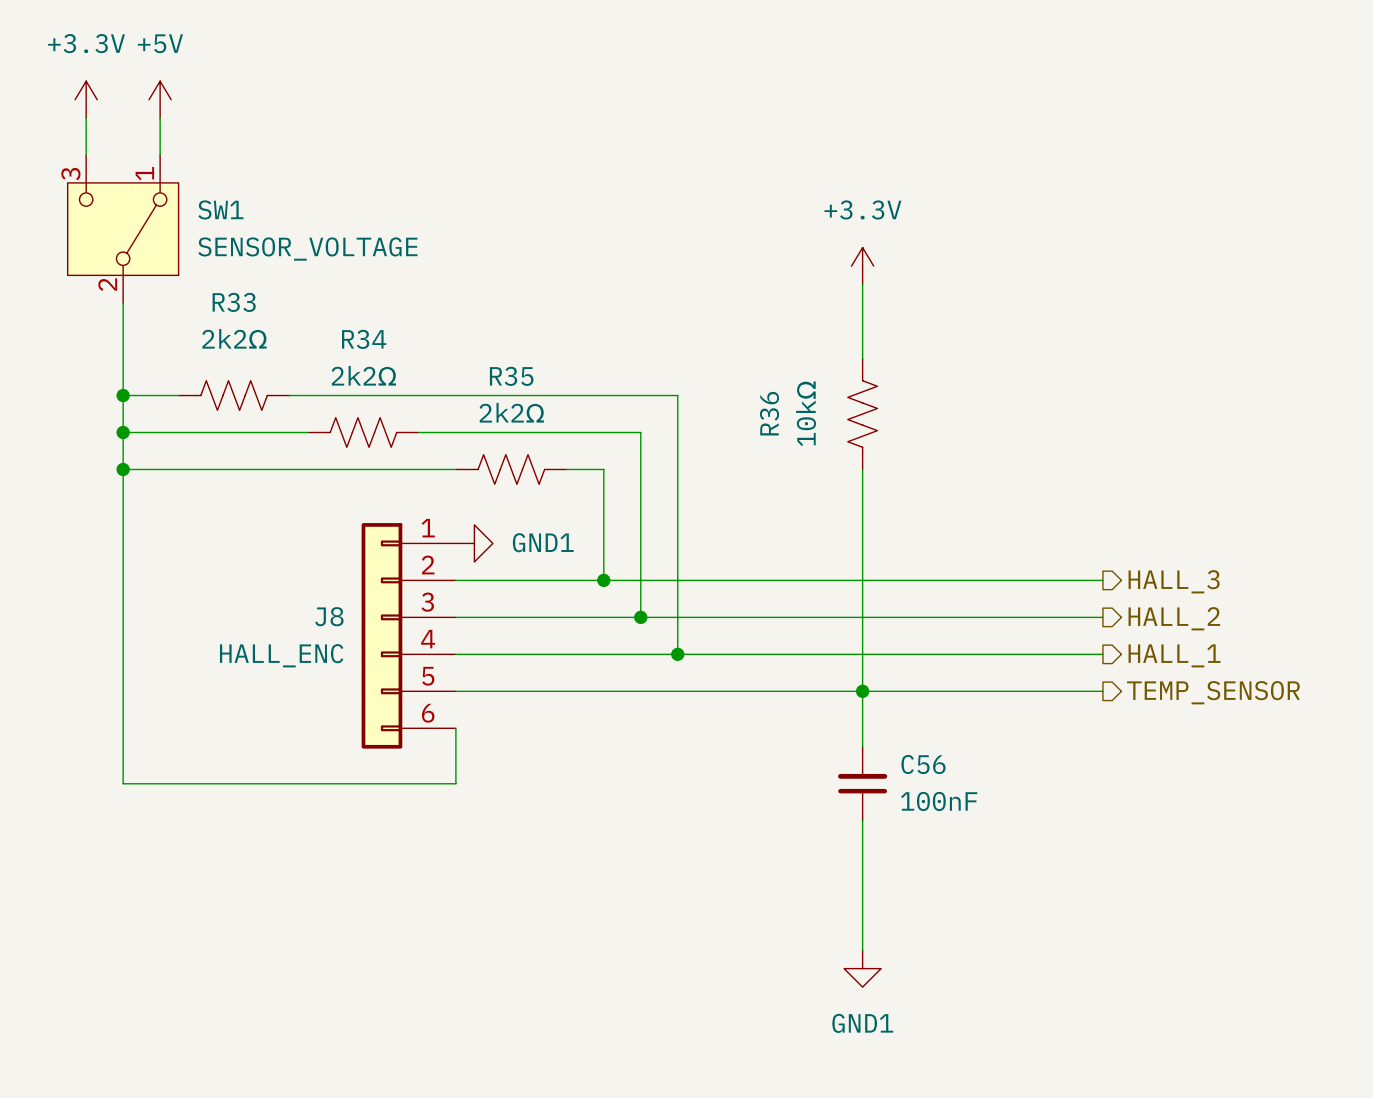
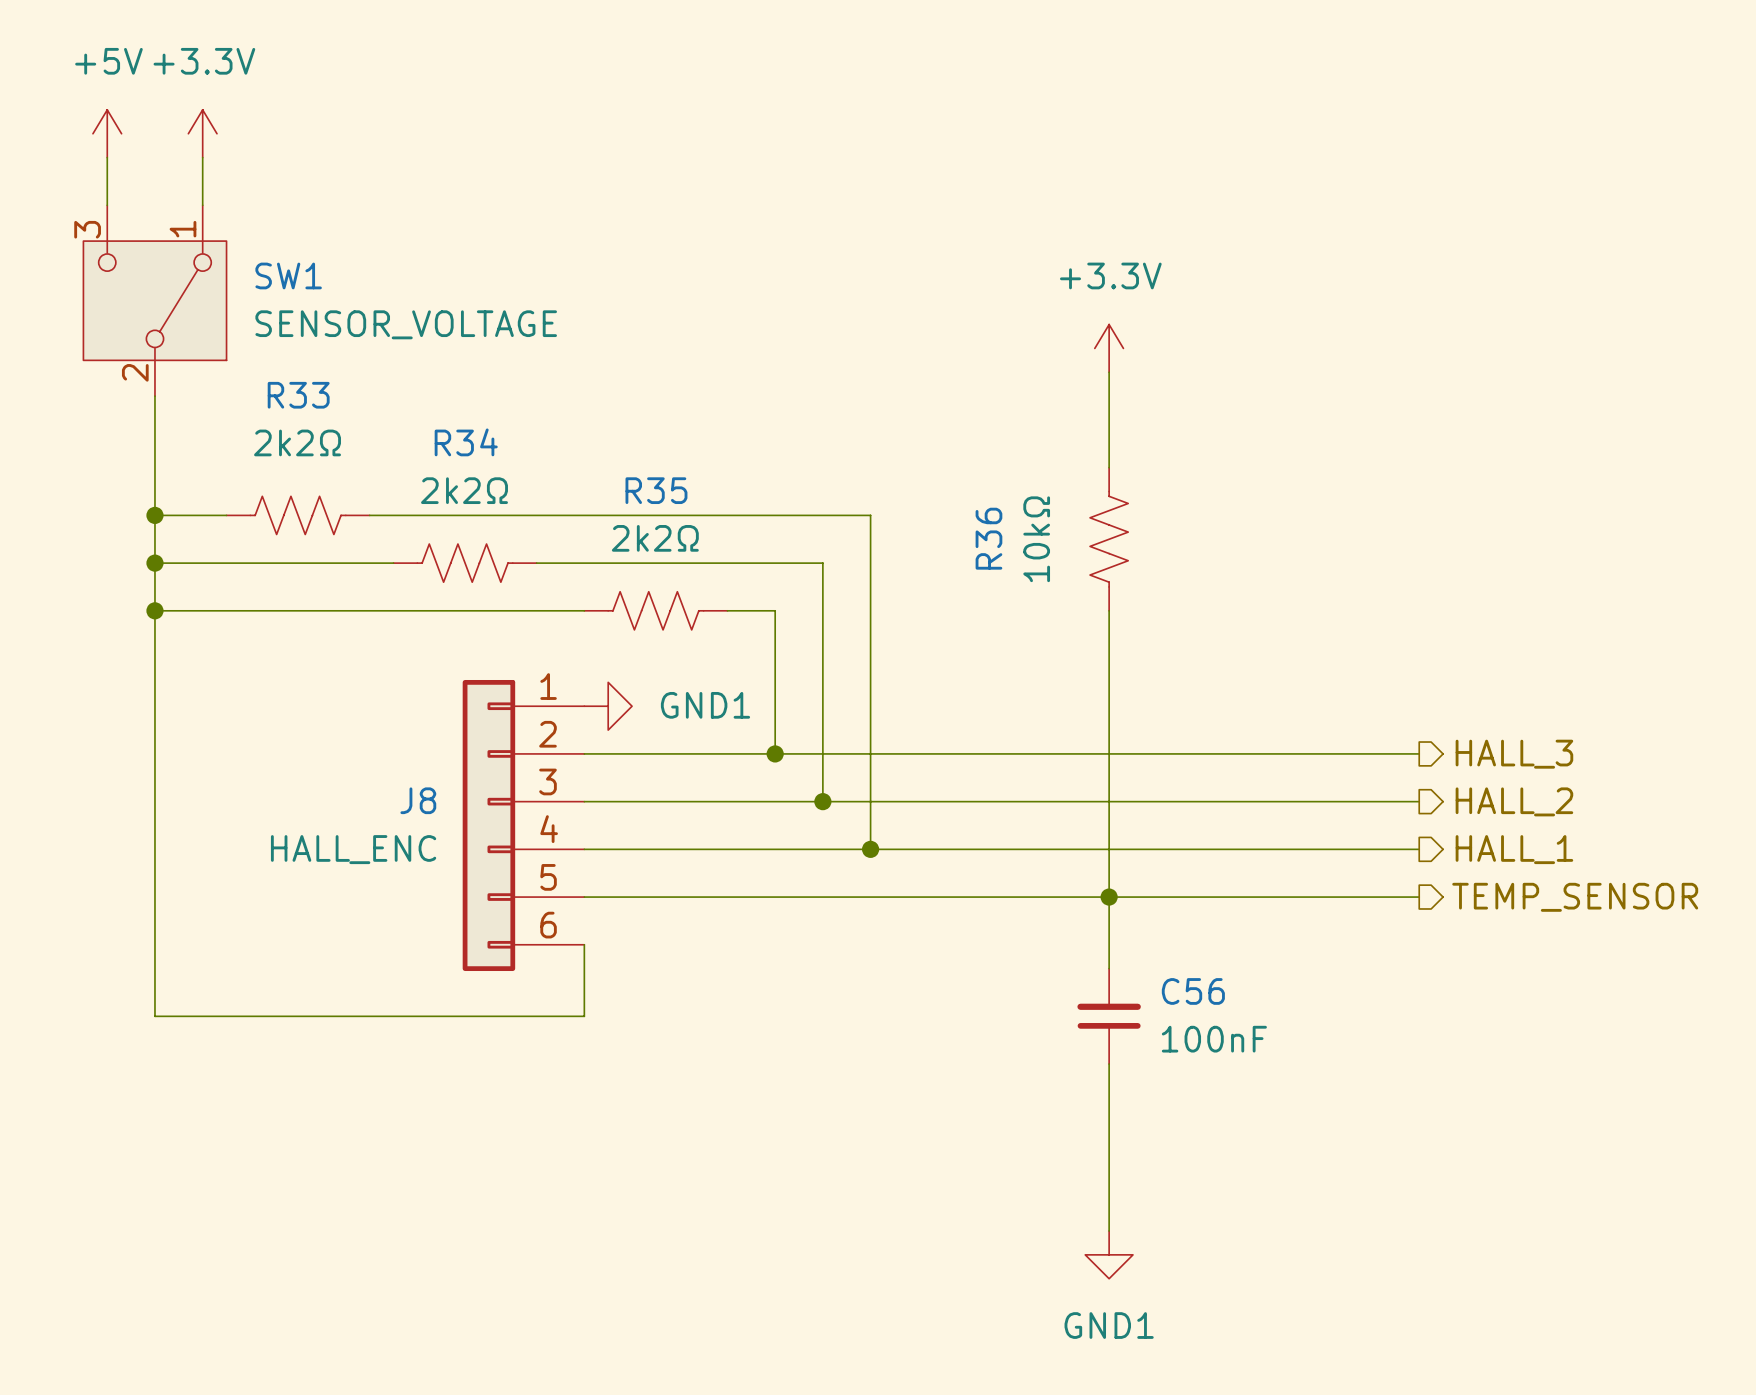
power symbol: +3.3V (86, 99) -> +5V (107, 133)
power symbol: +5V (160, 99) -> +3.3V (202, 133)

